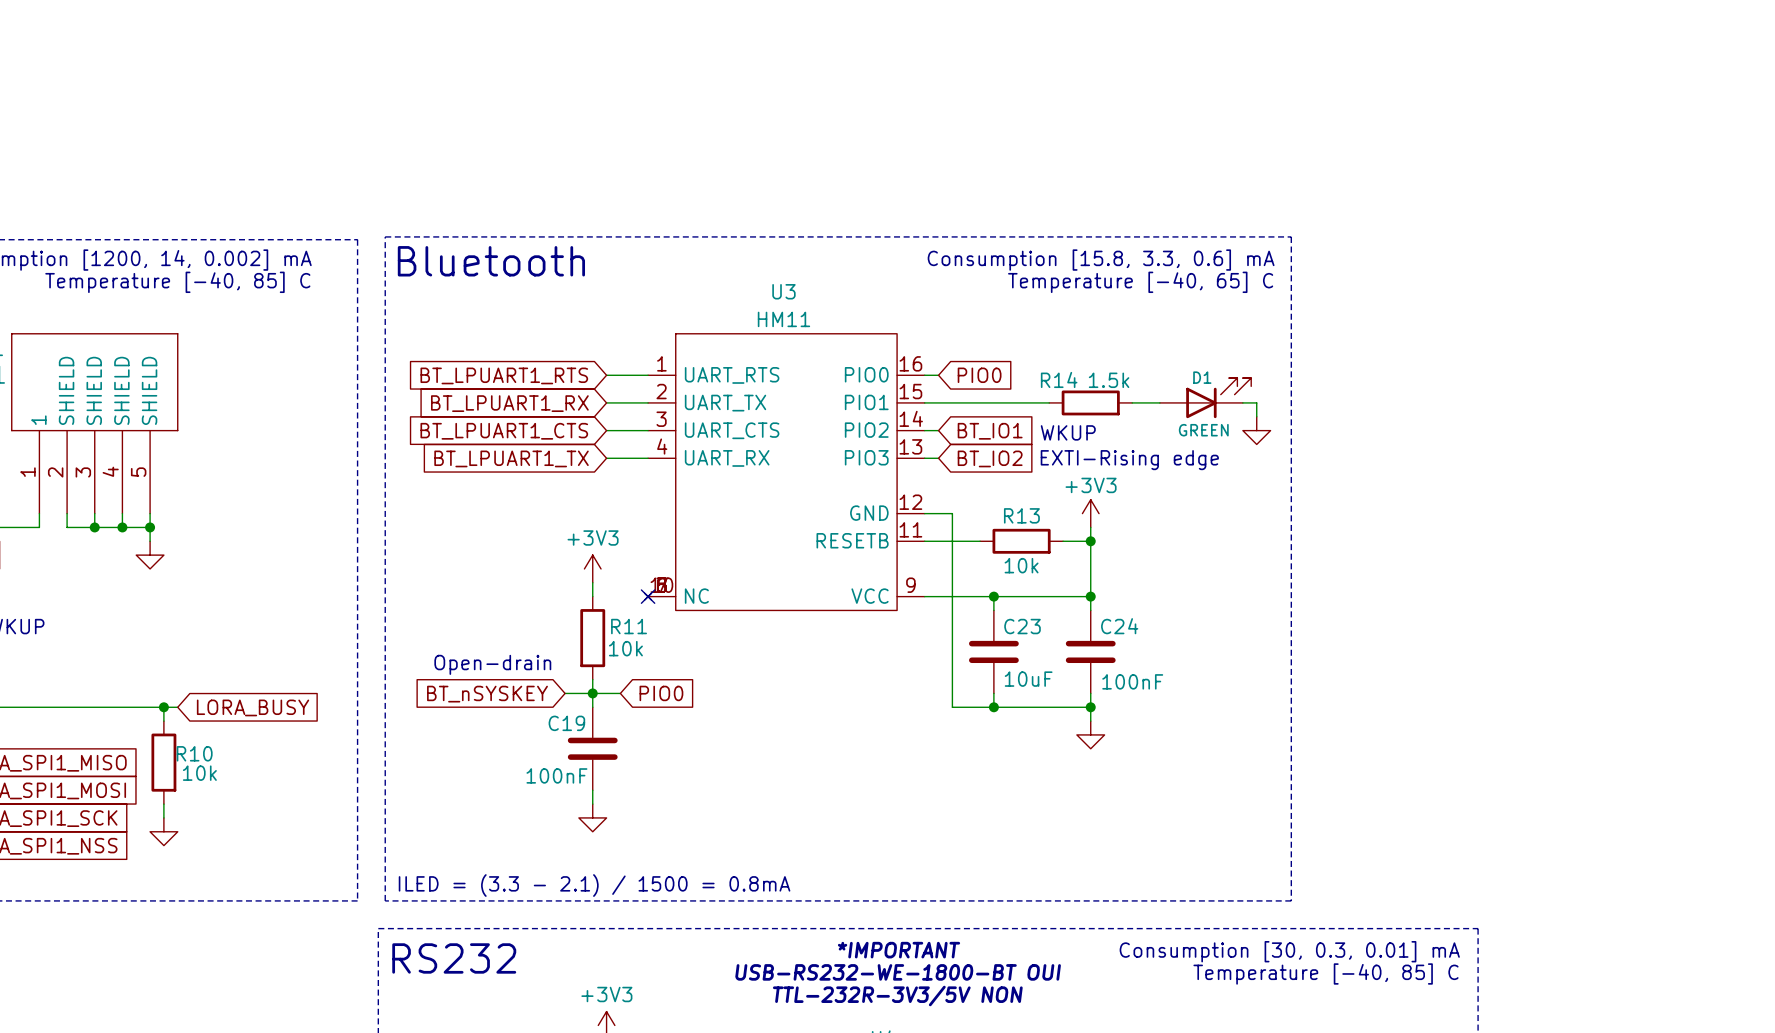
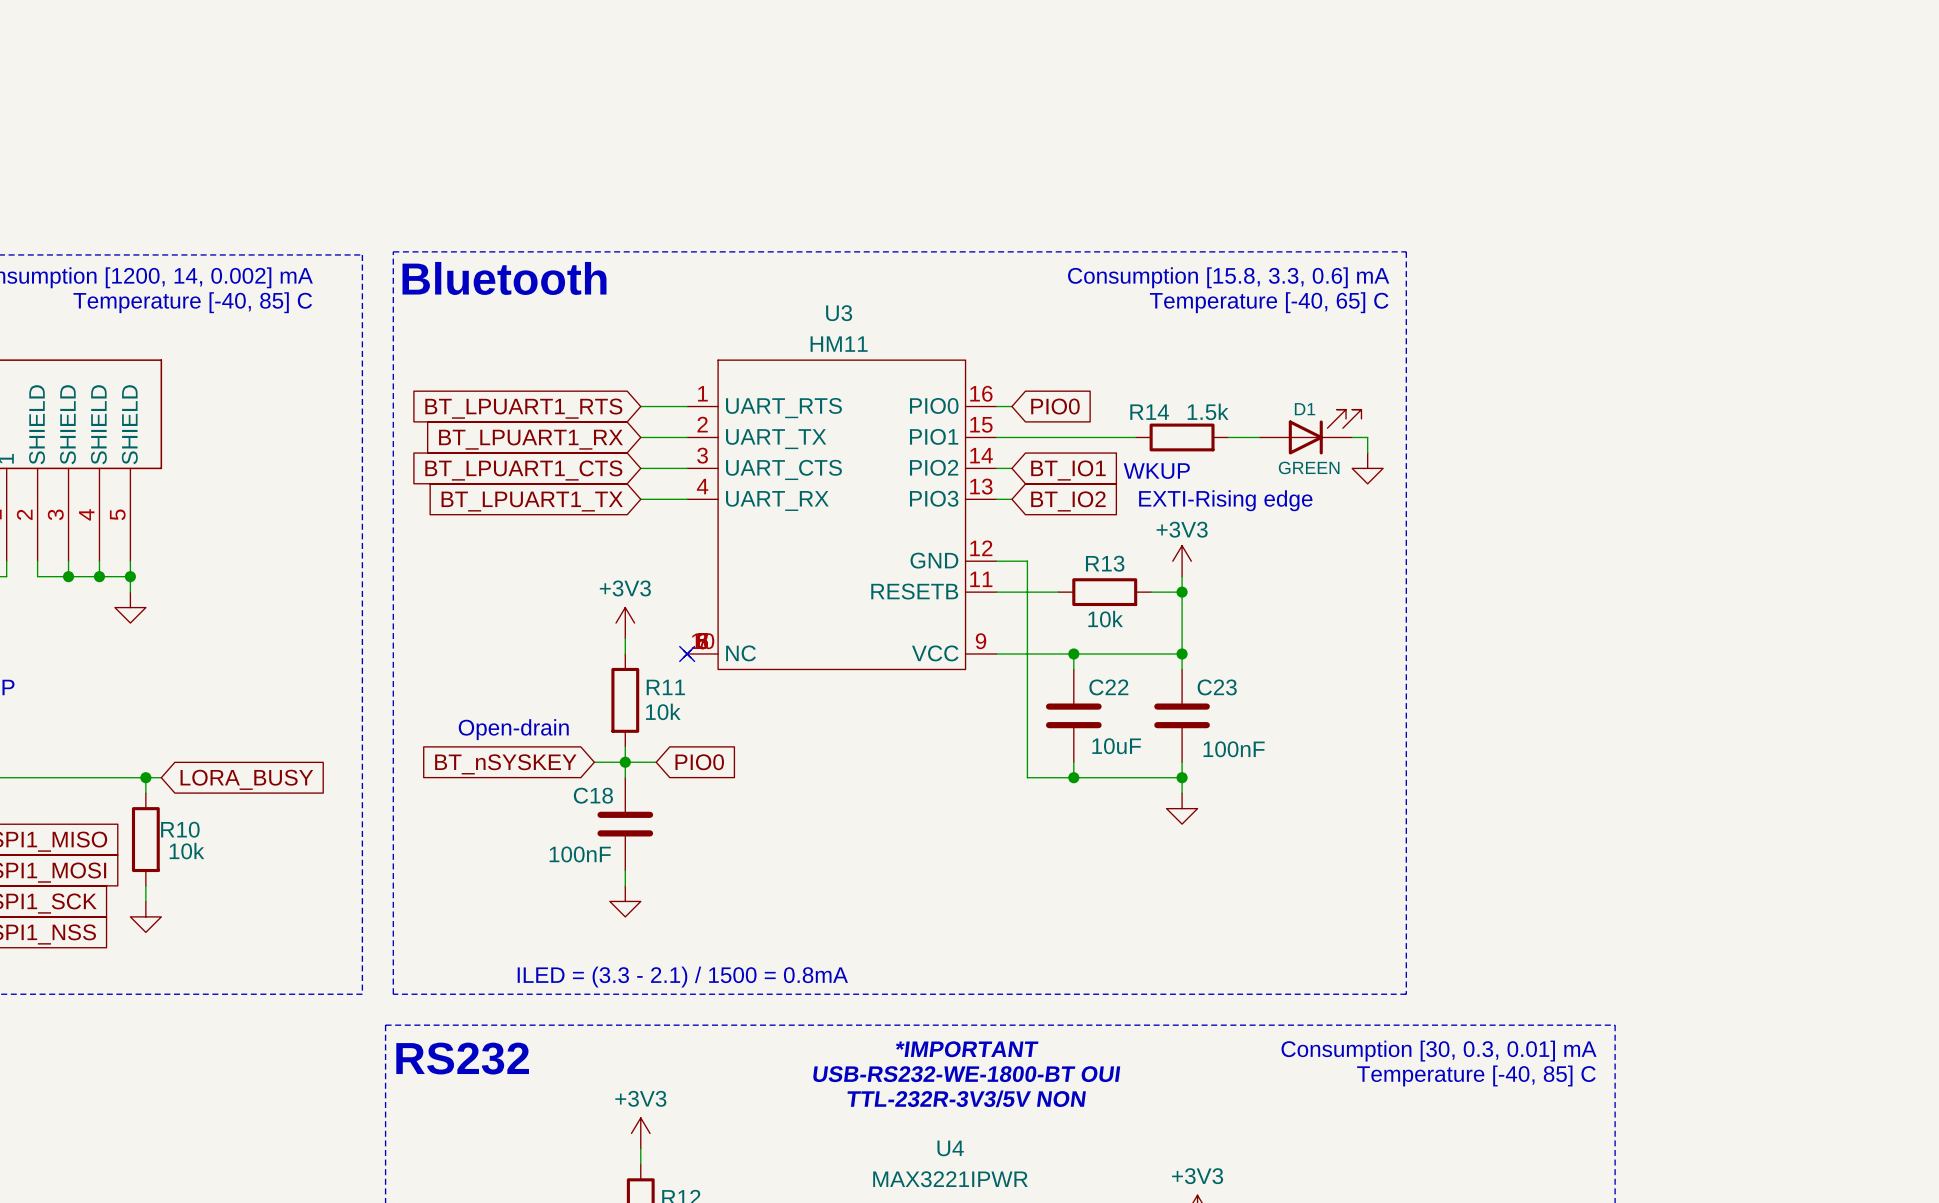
C23 name: C23 (1022, 626) -> C22 (1108, 687)
C24 name: C24 (1119, 626) -> C23 (1217, 687)
C19 name: C19 (566, 723) -> C18 (593, 795)

